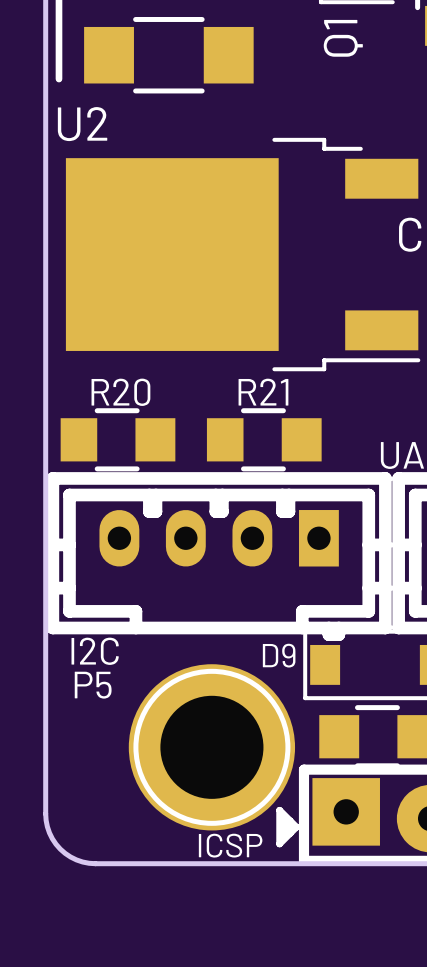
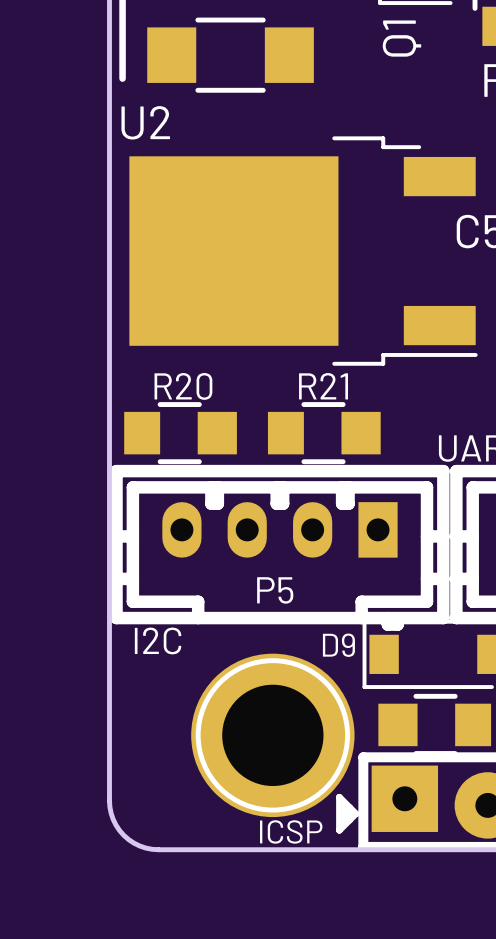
P5 name position: P5 (93, 685) -> P5 (275, 590)

